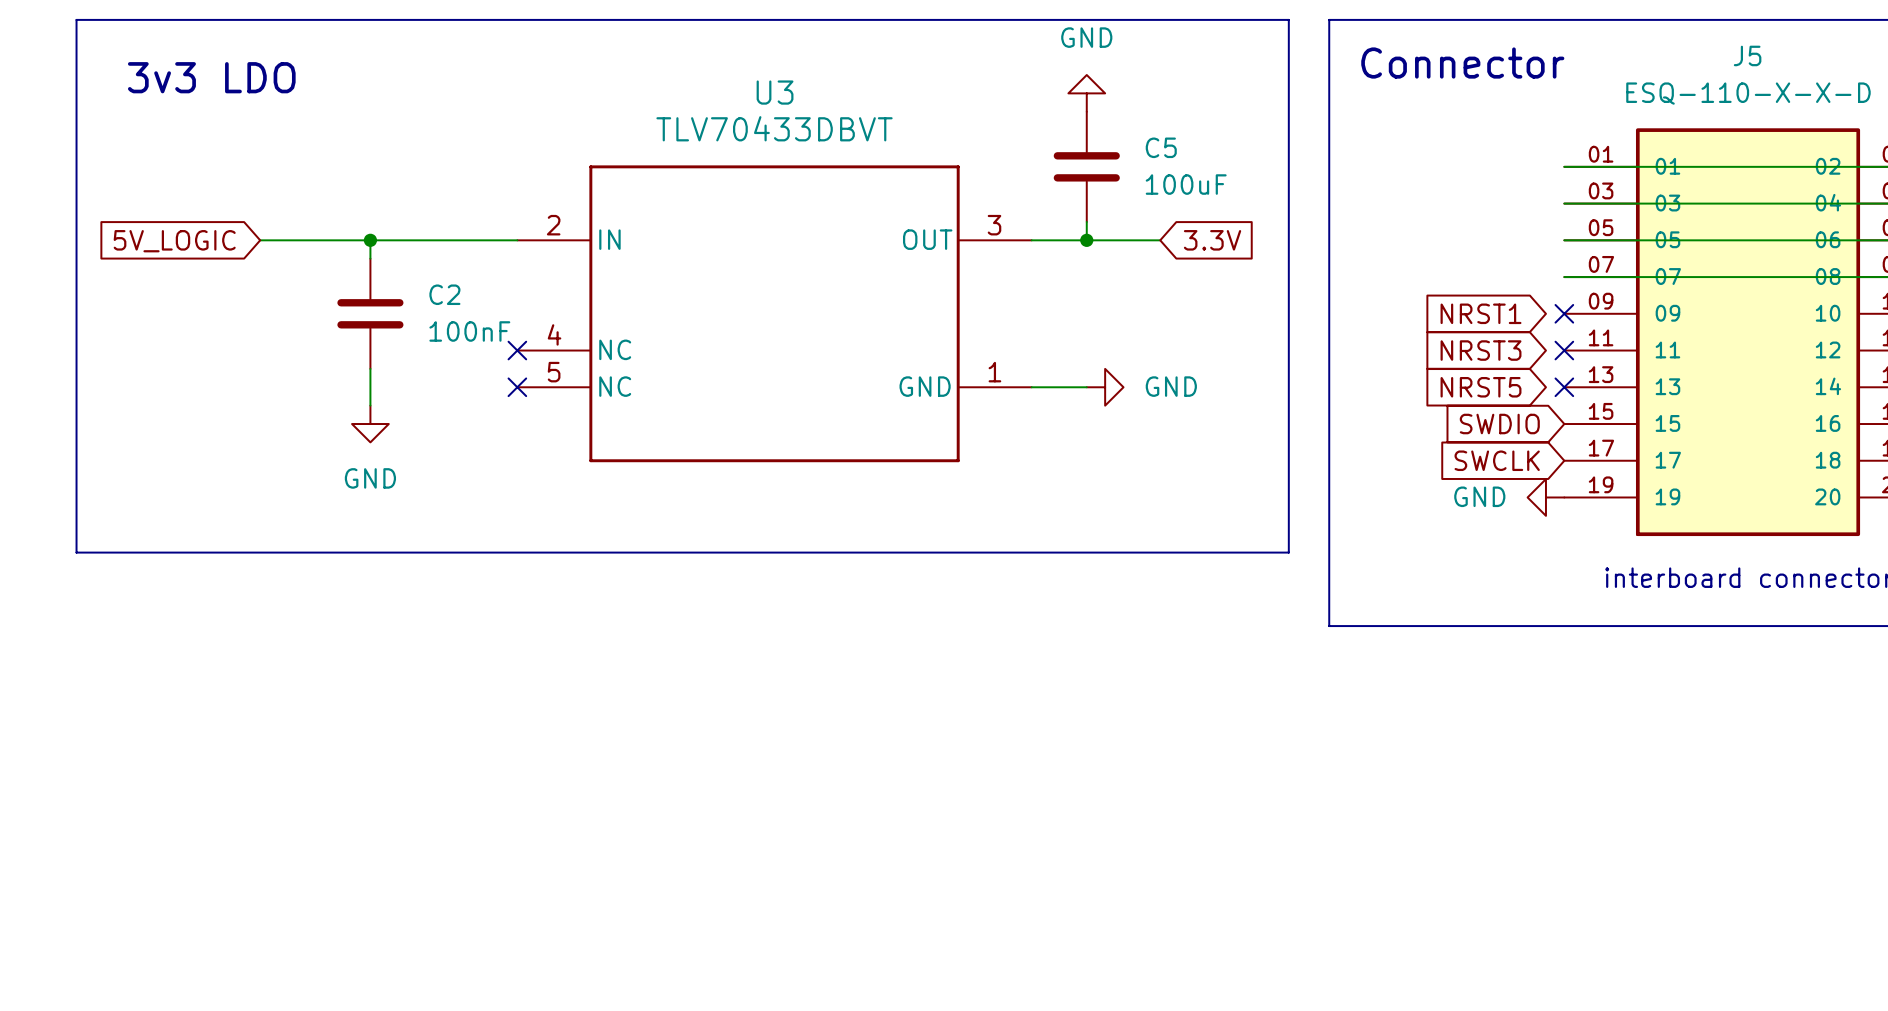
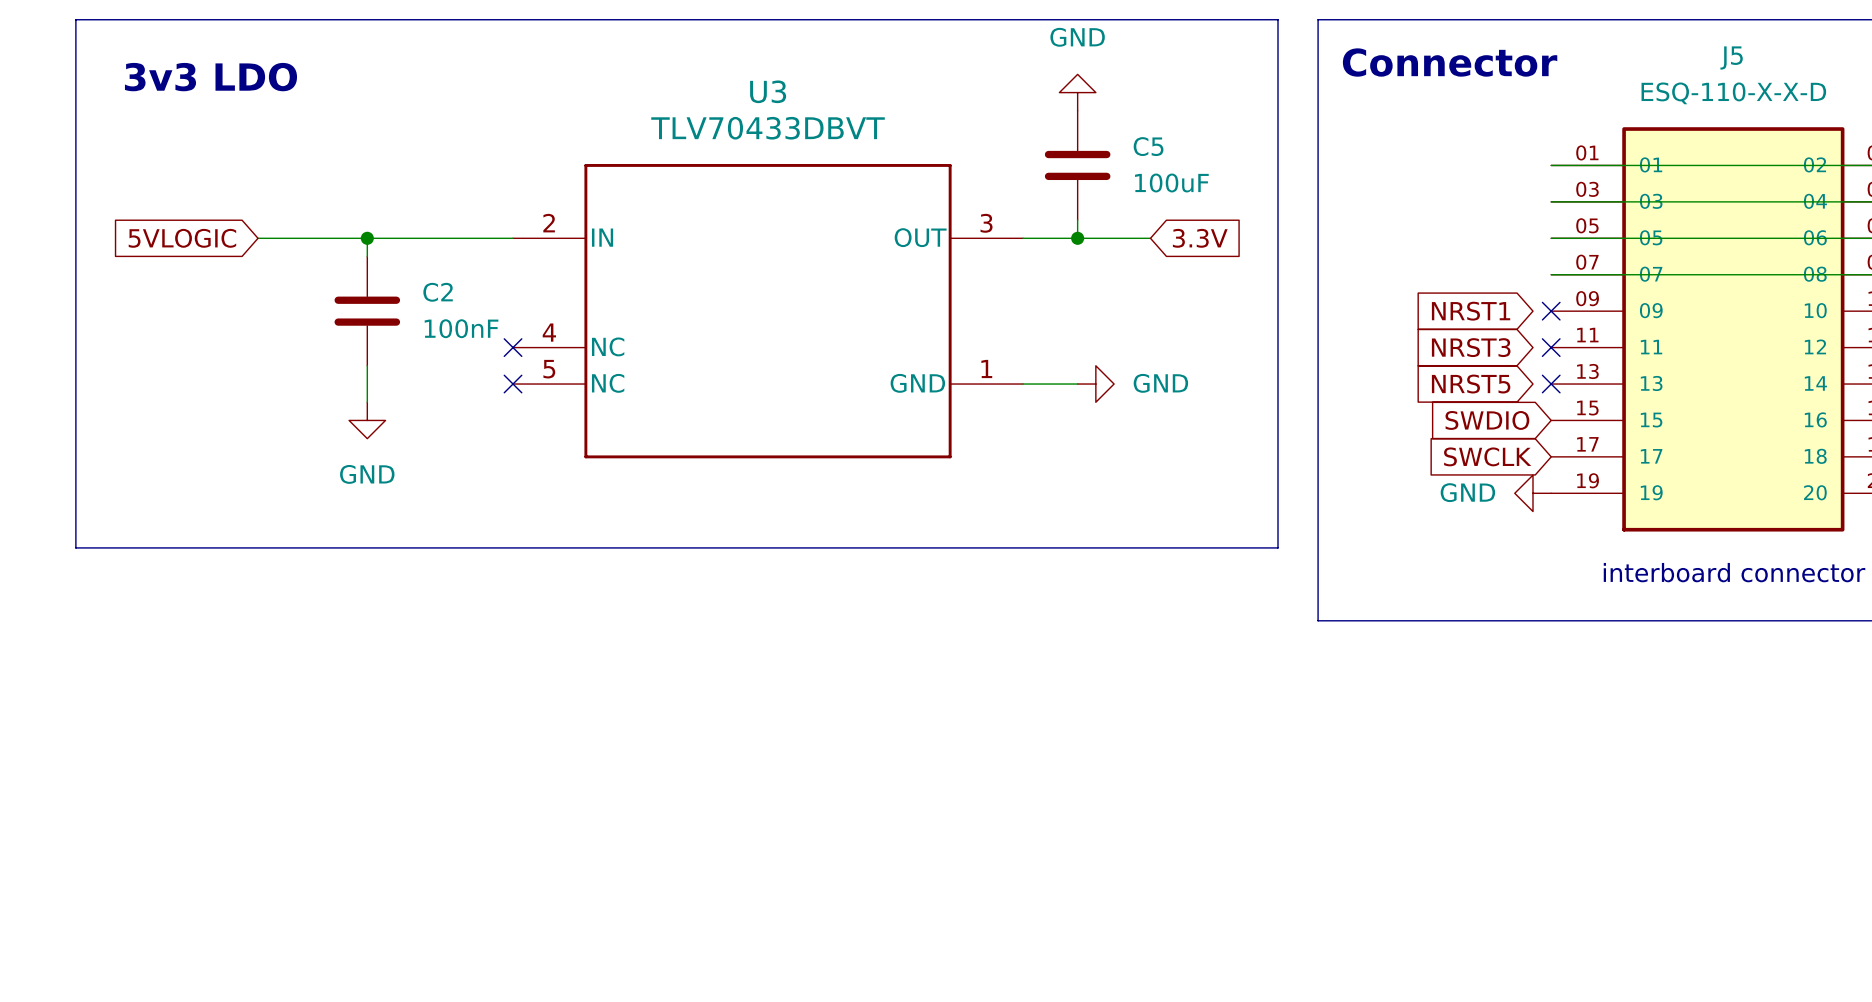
global label: 5V_LOGIC (174, 241) -> 5VLOGIC (182, 238)

